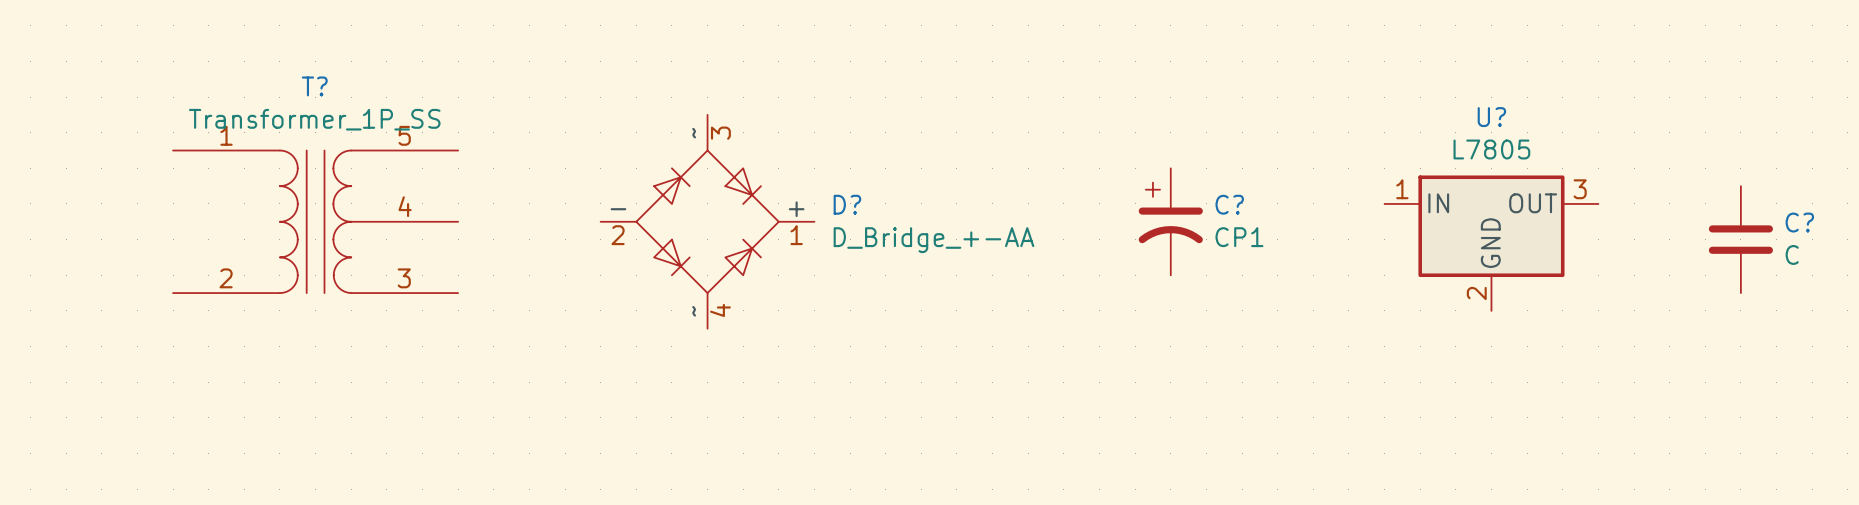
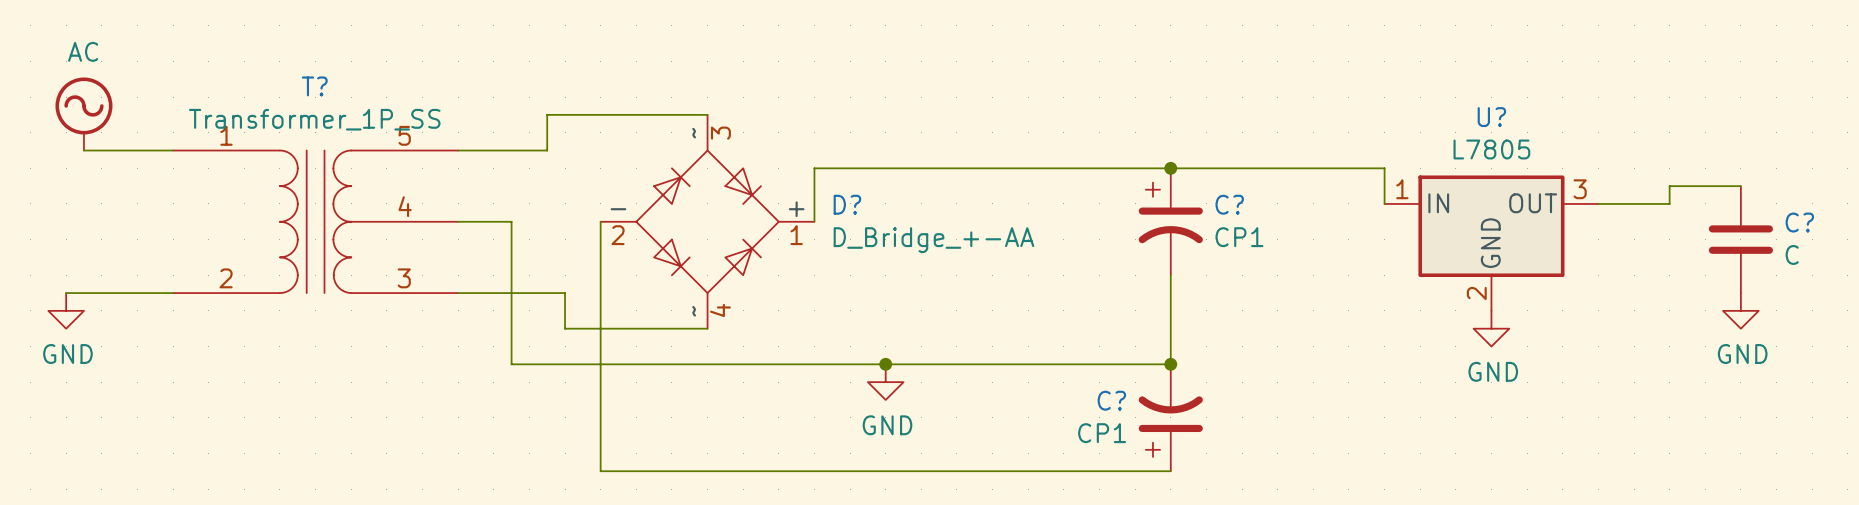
power symbol: none -> AC (83, 113)
wire: none -> (707, 114) (547, 114) (547, 150) (458, 150)
wire: none -> (83, 150) (173, 150)
junction: none -> (1170, 168)
wire: none -> (1740, 186) (1669, 186) (1669, 203) (1598, 203)
wire: none -> (1384, 203) (1384, 168) (814, 168) (814, 221)
wire: none -> (458, 221) (511, 221) (511, 364) (1170, 364) (1170, 275)
wire: none -> (600, 221) (600, 471) (1170, 471)
wire: none -> (66, 293) (173, 293)
wire: none -> (458, 293) (565, 293) (565, 328) (707, 328)
power symbol: none -> GND (66, 310)
power symbol: none -> GND (1740, 310)
power symbol: none -> GND (1491, 328)
junction: none -> (885, 364)
junction: none -> (1170, 364)
power symbol: none -> GND (885, 382)
C?: none -> CP1 (1170, 417)

